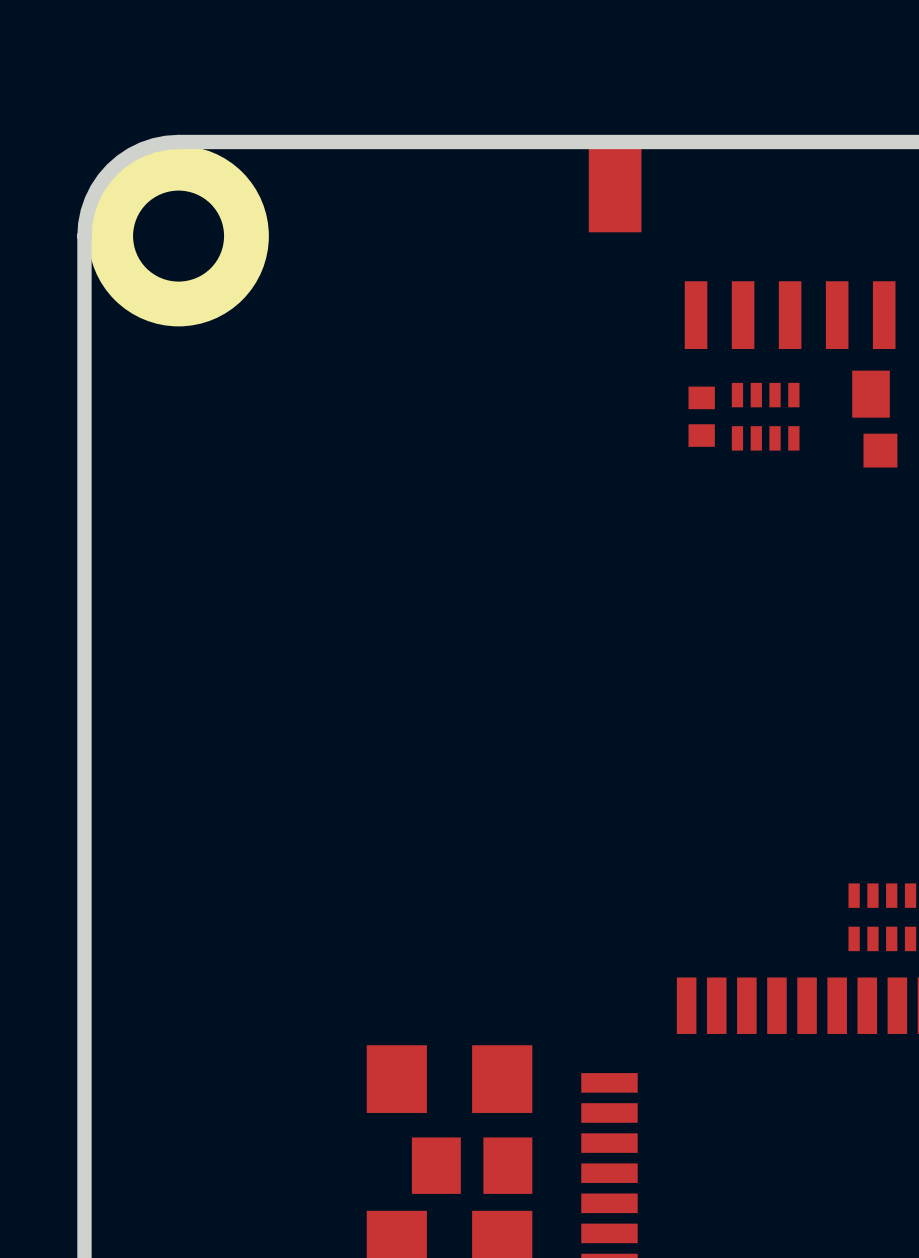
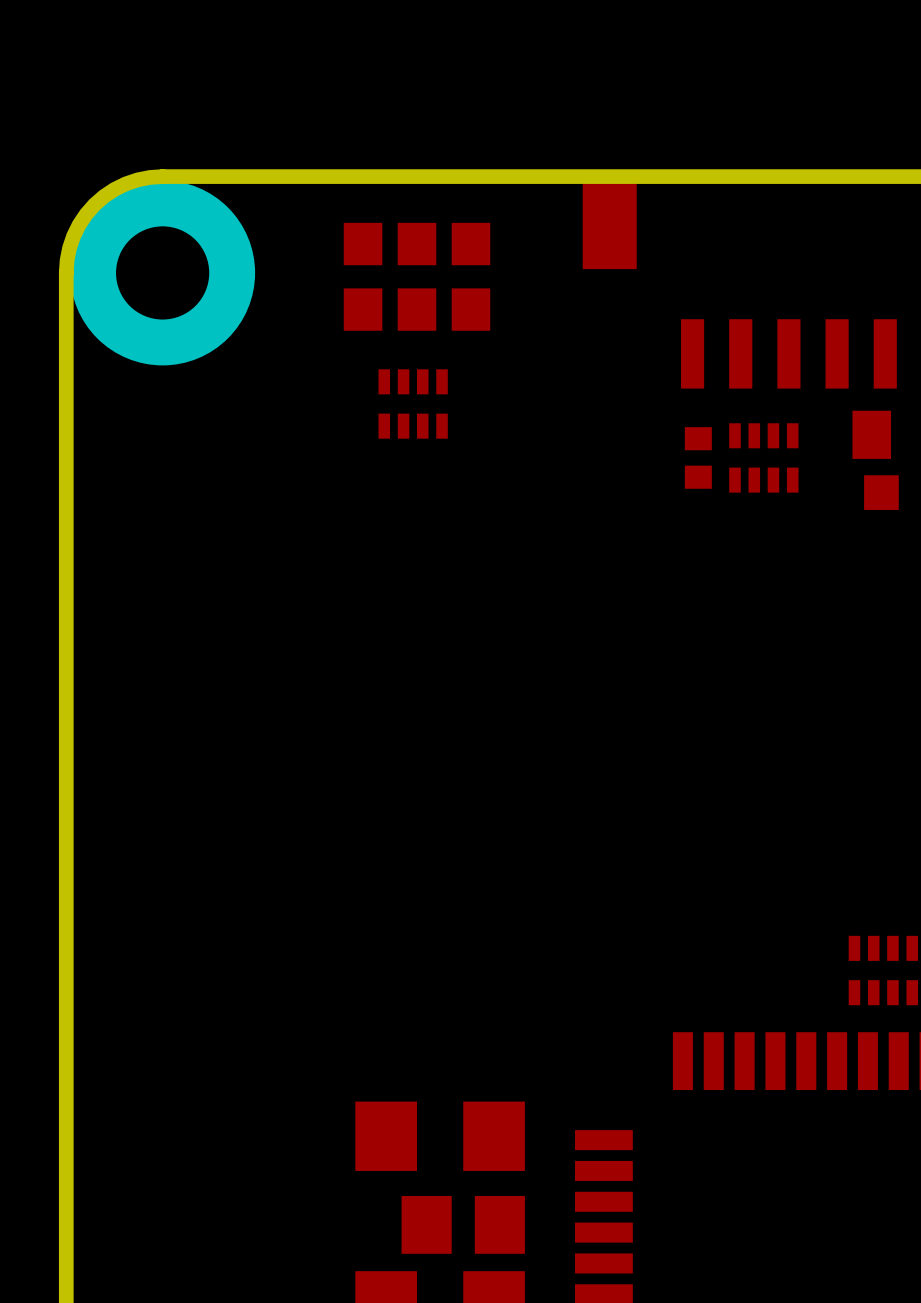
part: none -> (363, 276)
part: none -> (417, 276)
part: none -> (470, 276)
part: none -> (413, 403)

